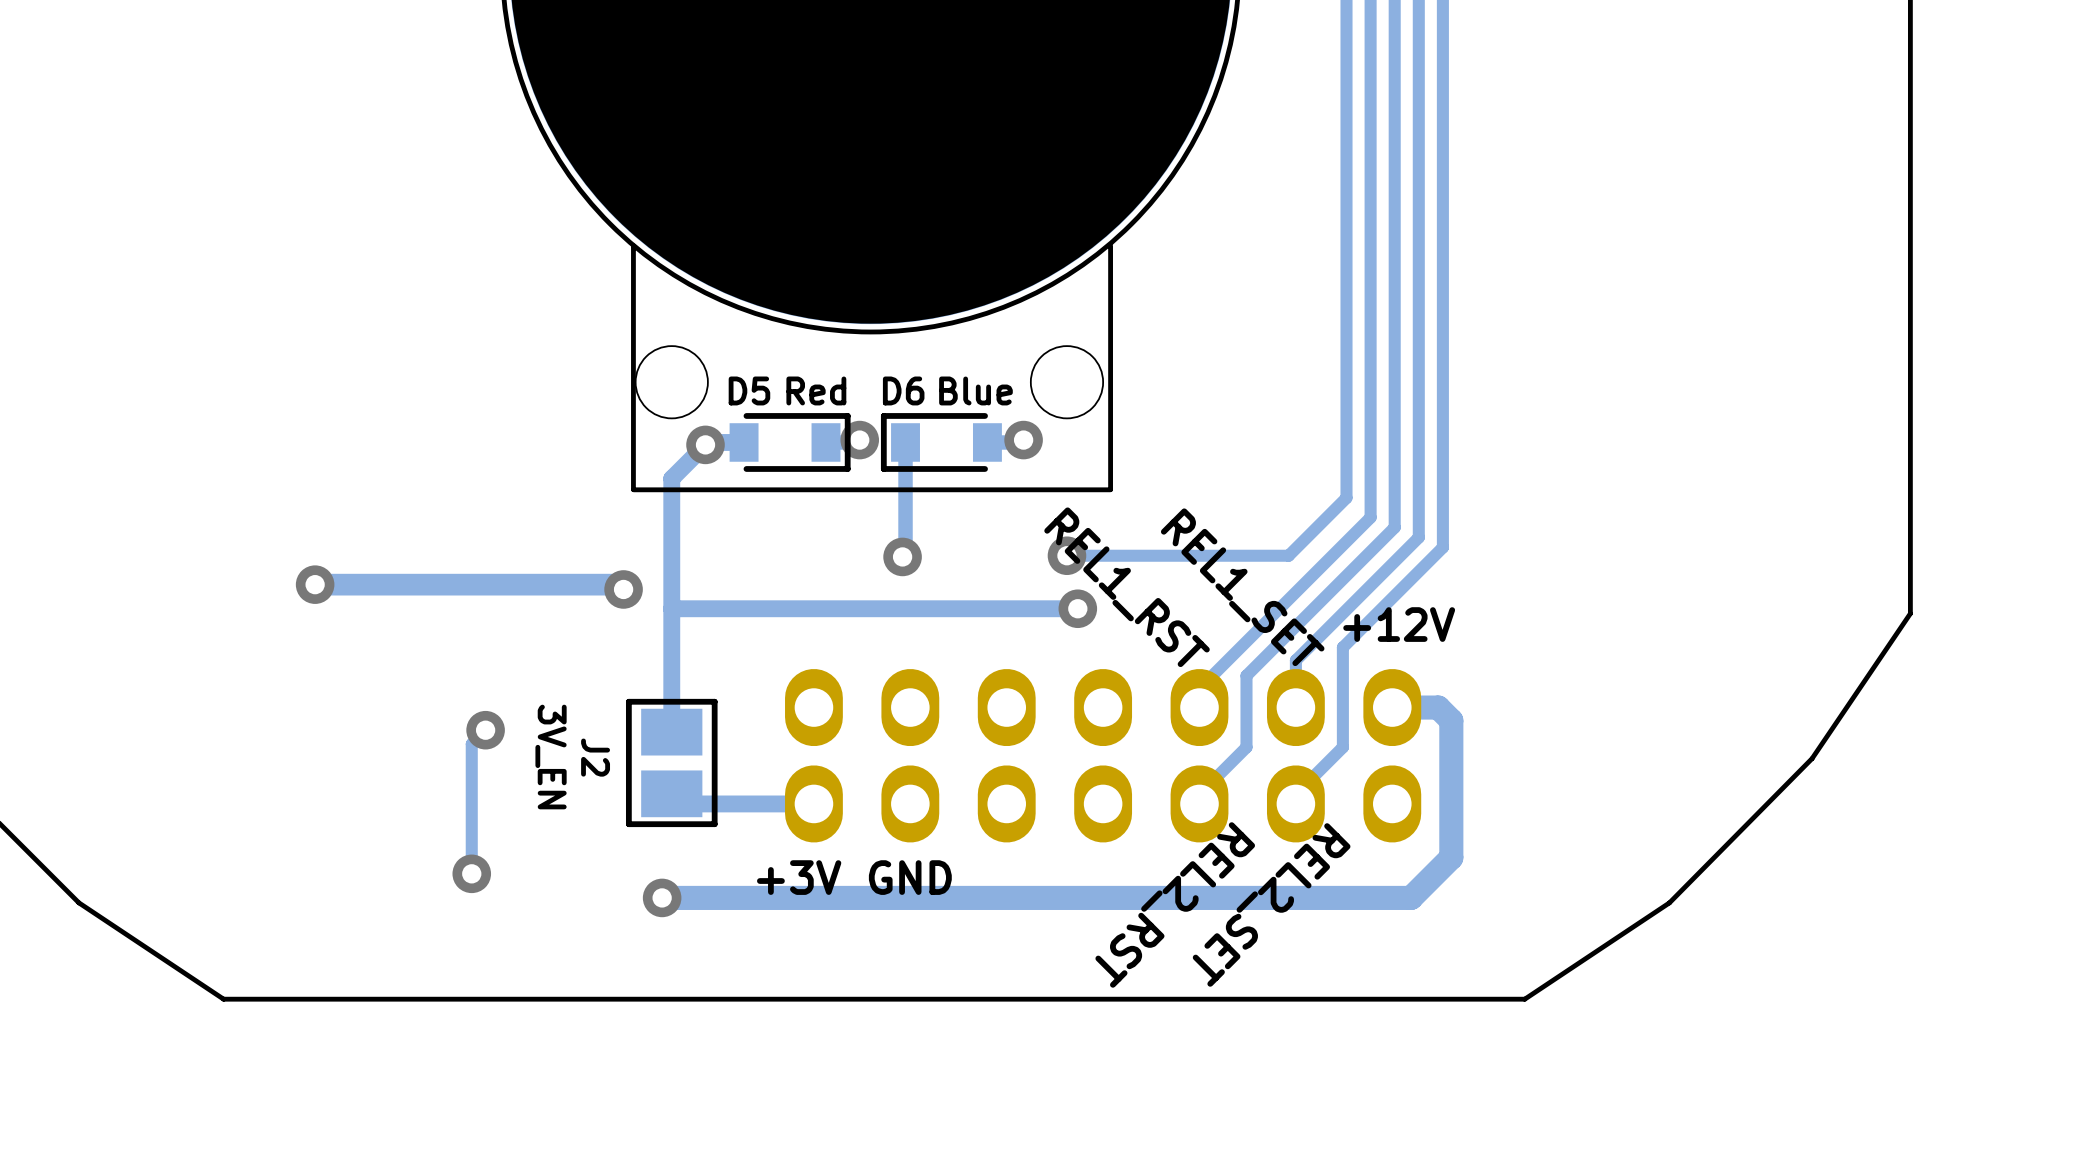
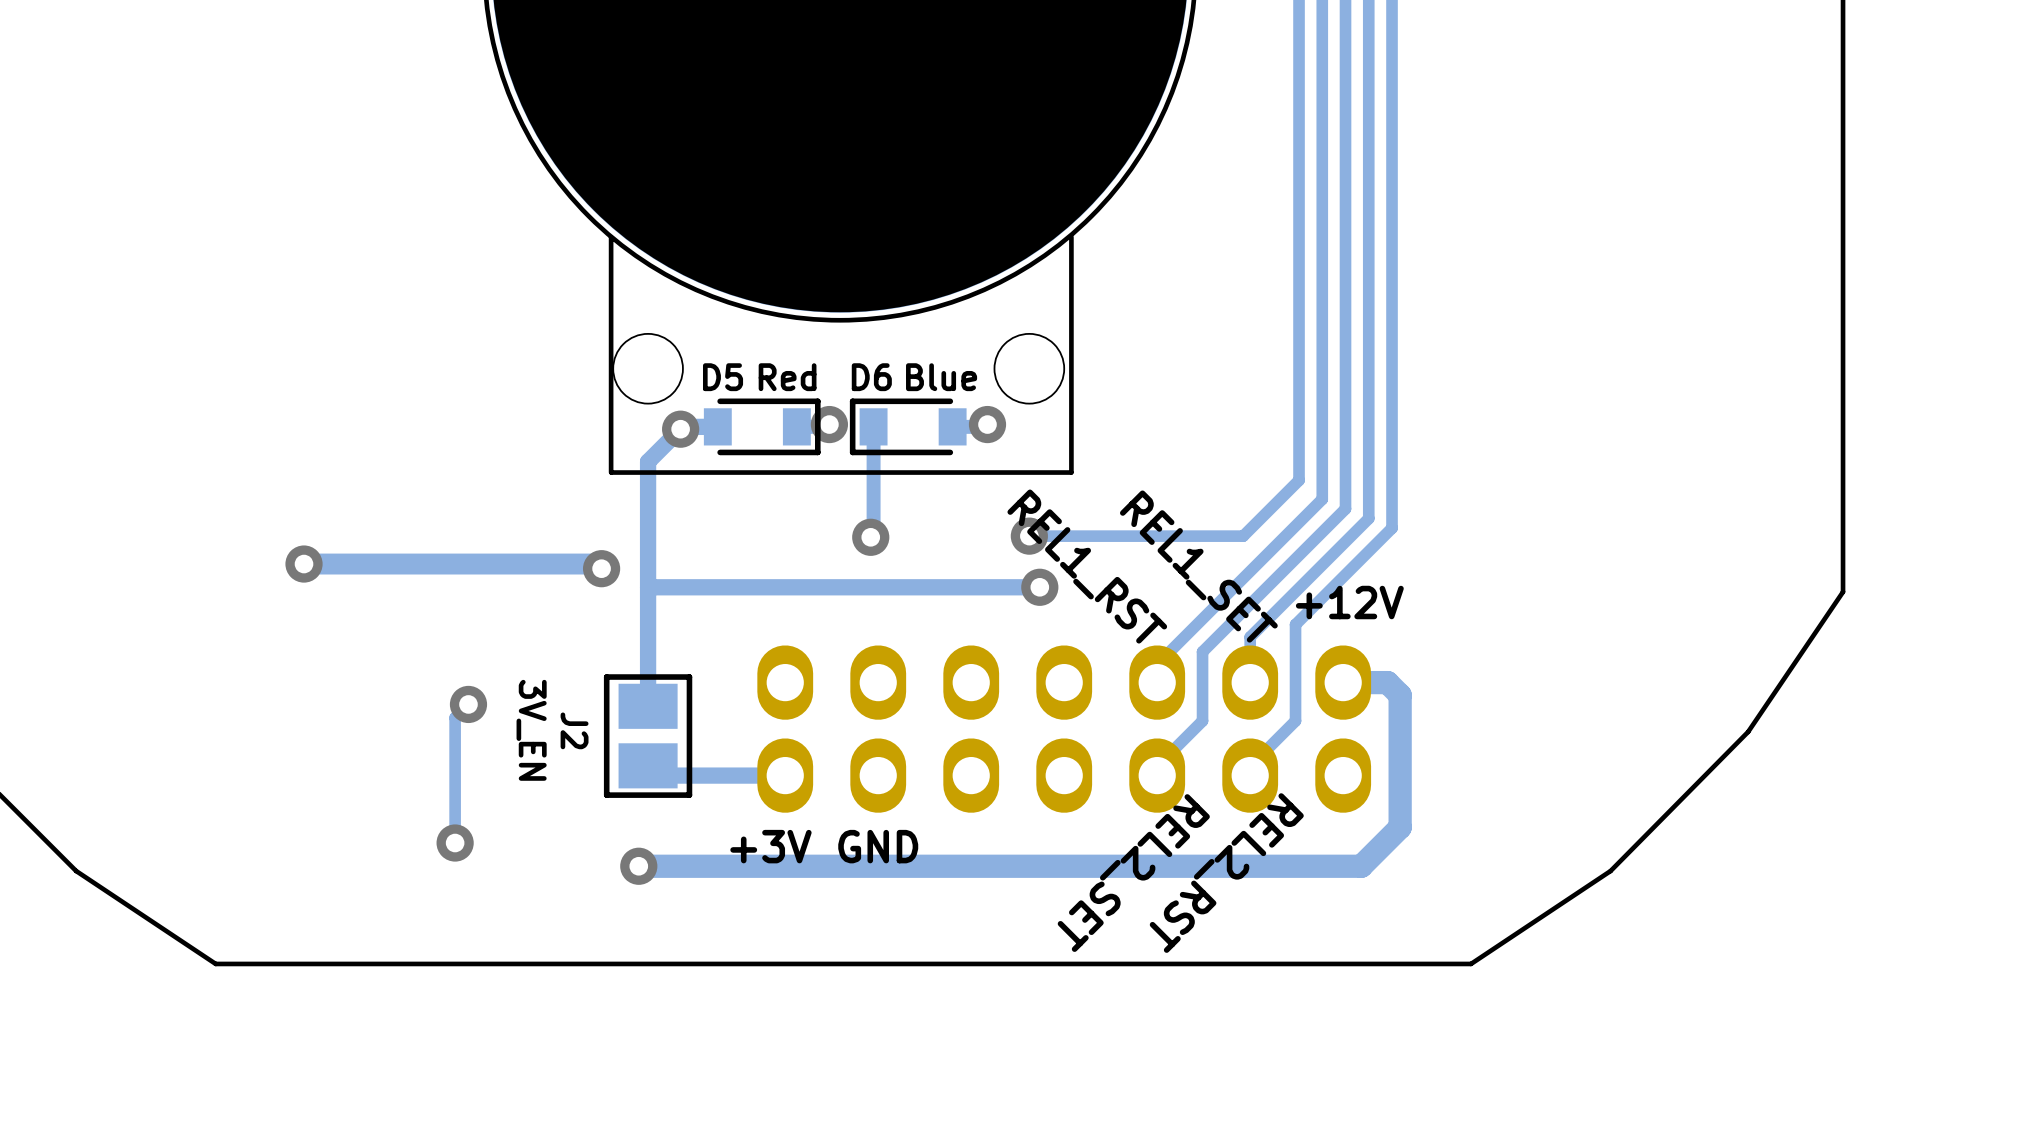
text: REL2_RST (1175, 904) -> REL2_SET (1133, 873)
text: REL2_SET (1271, 904) -> REL2_RST (1226, 873)

